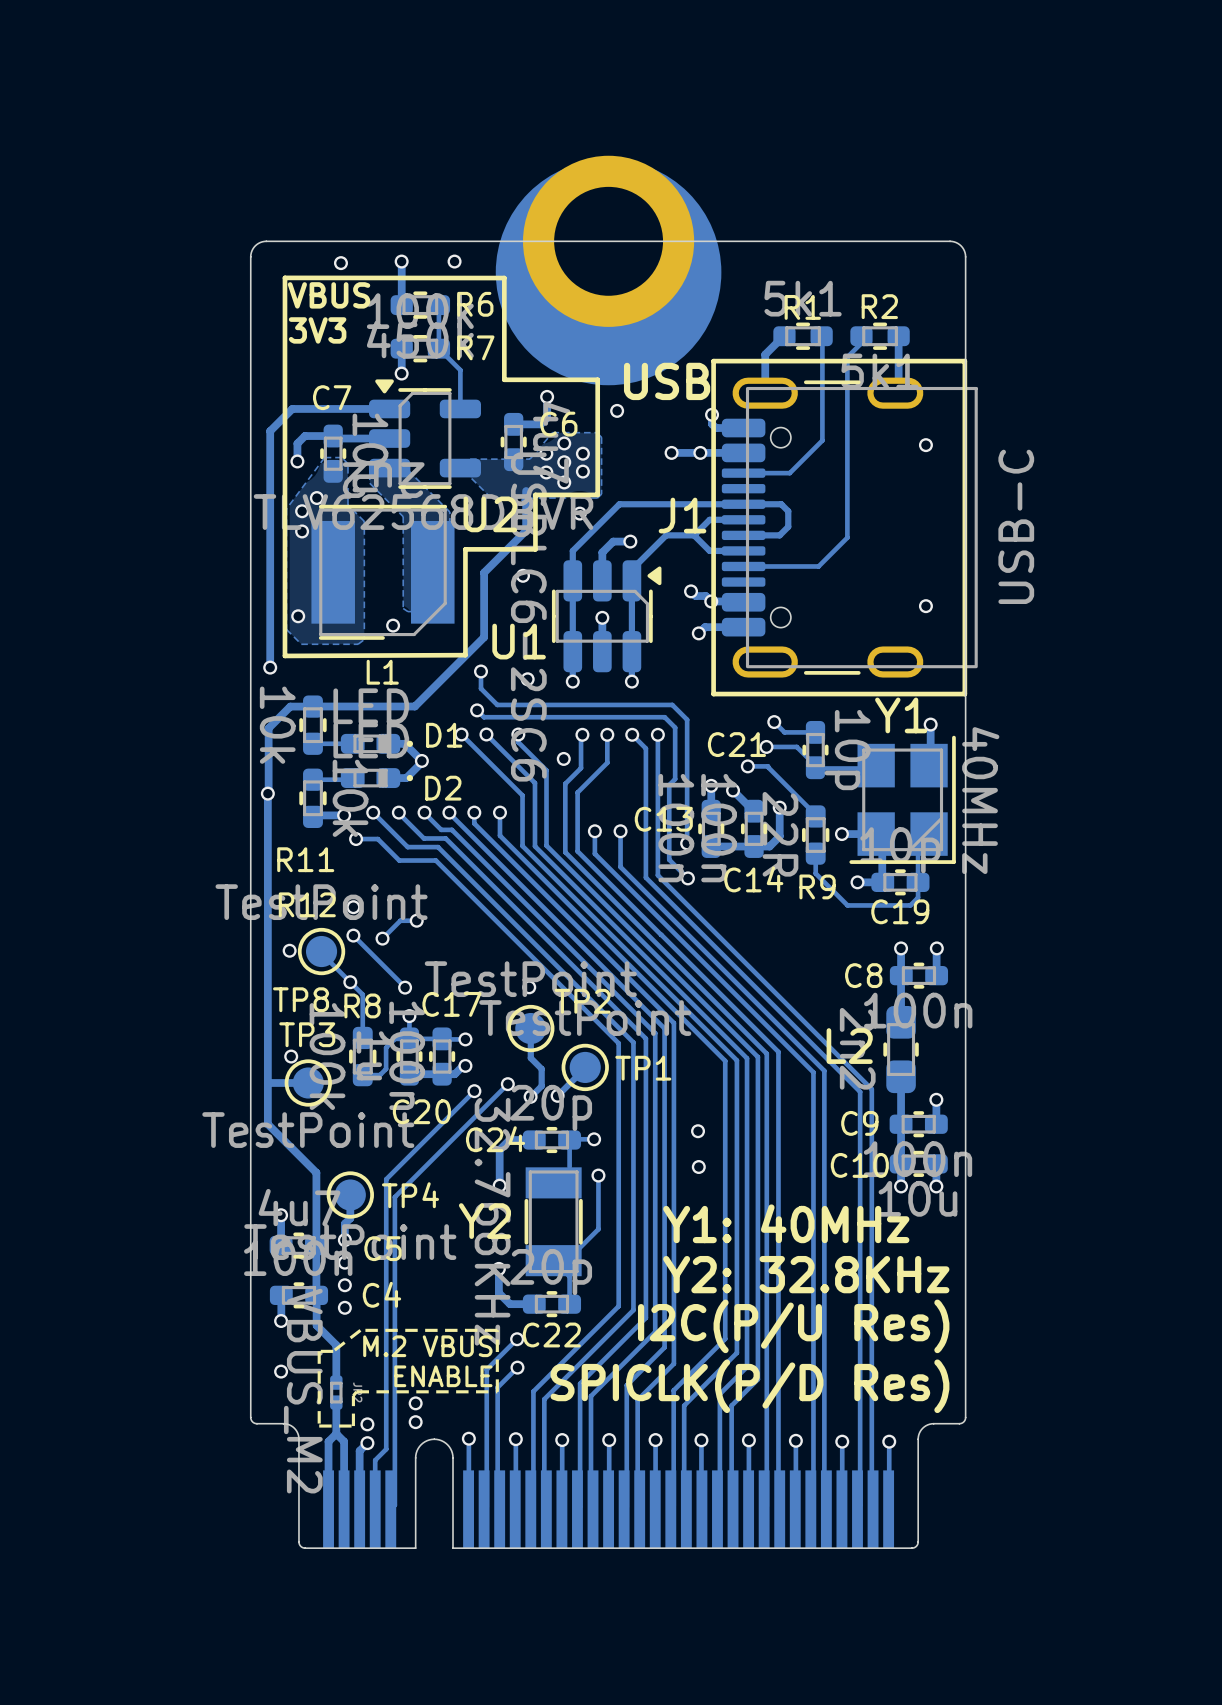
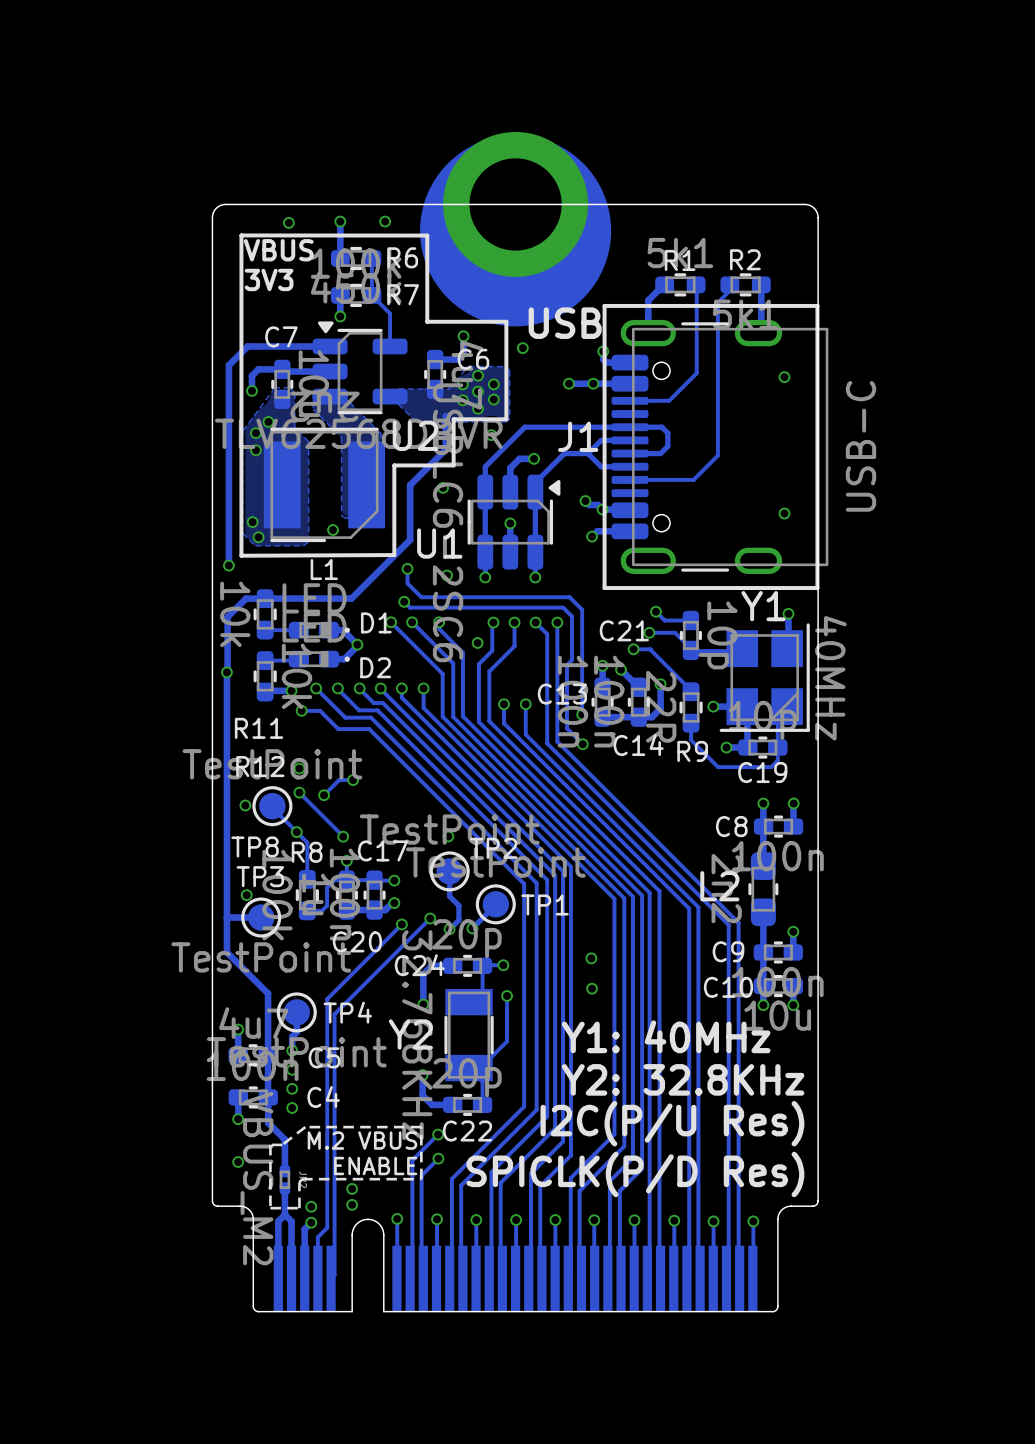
via: none -> (258, 537)

